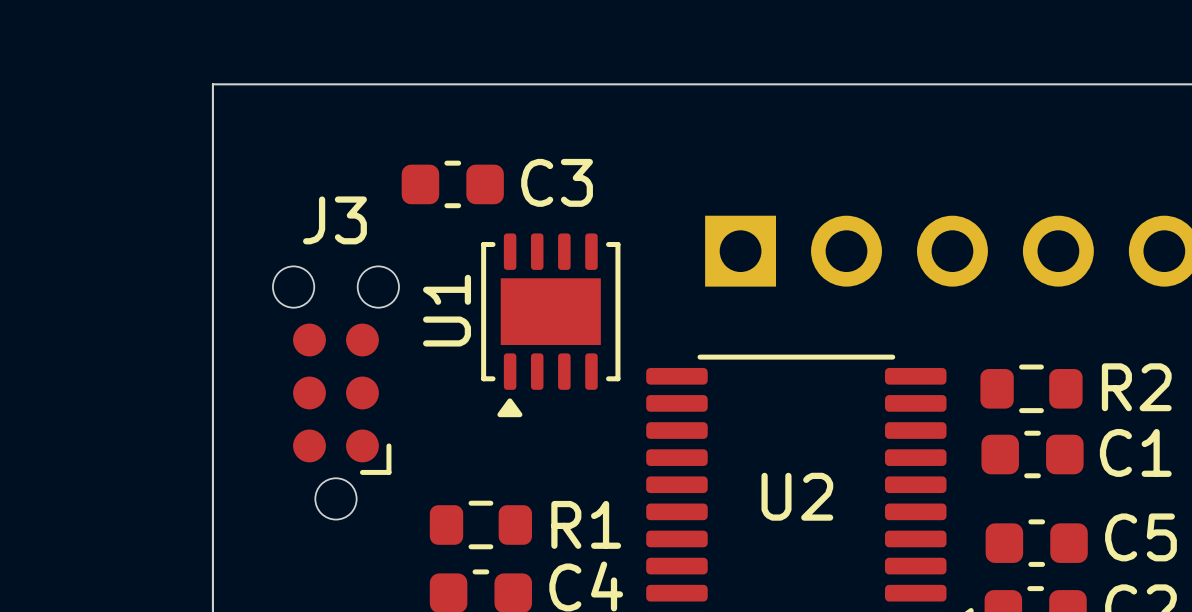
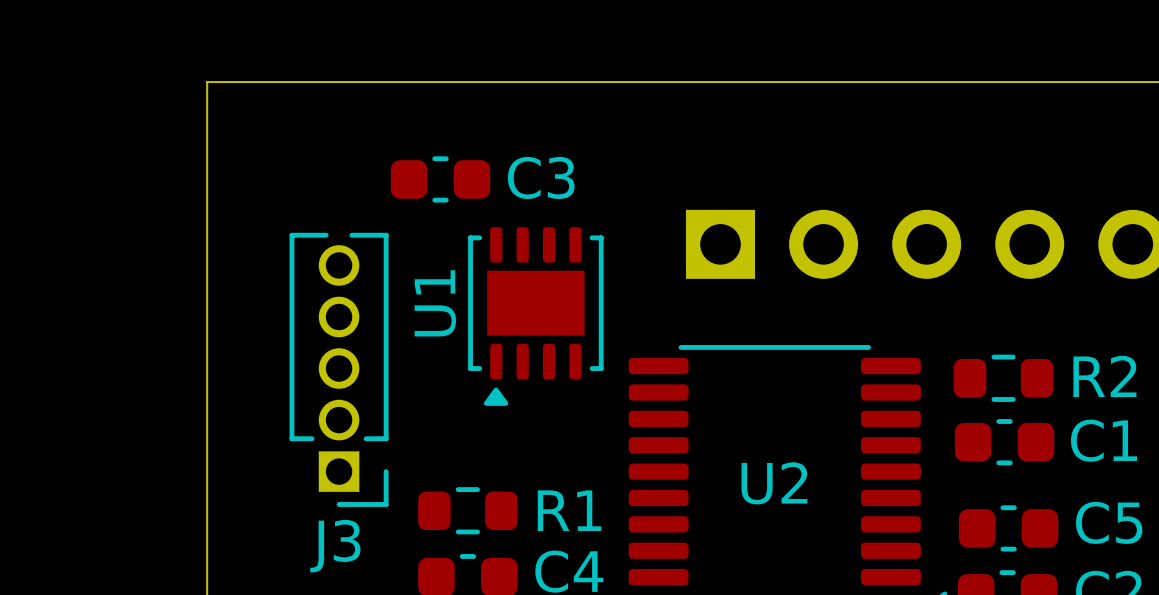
J3 name position: J3 (334, 220) -> J3 (335, 546)
J3 footprint: [272, 266, 400, 520] -> [289, 232, 389, 507]

